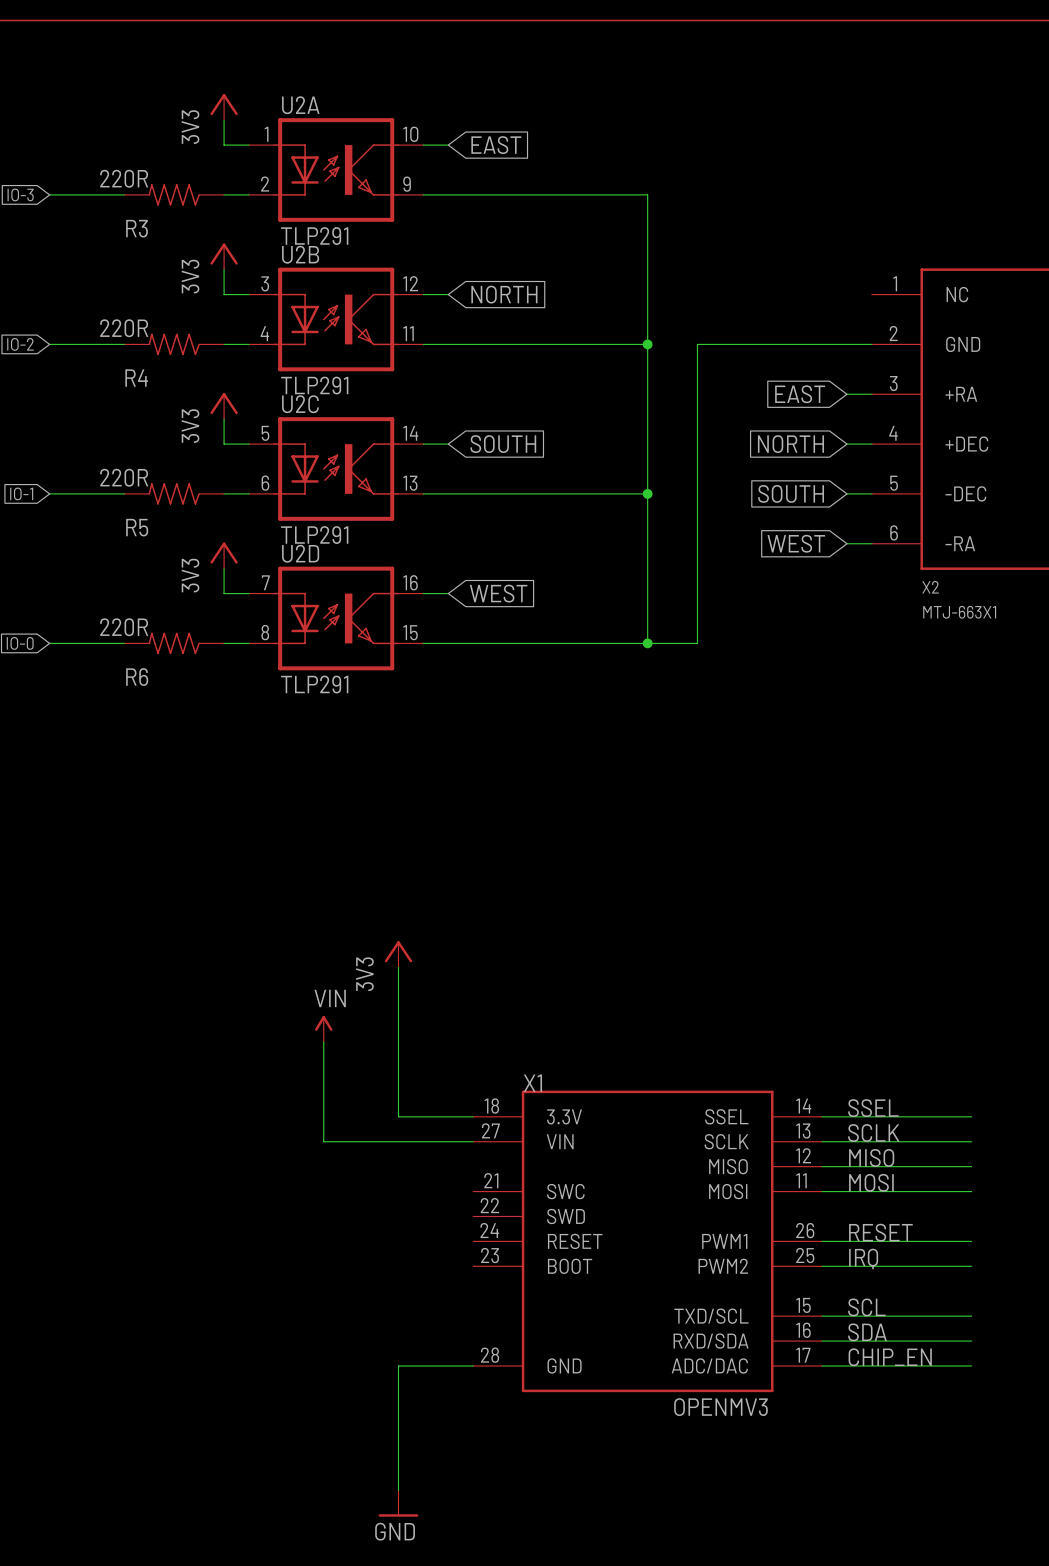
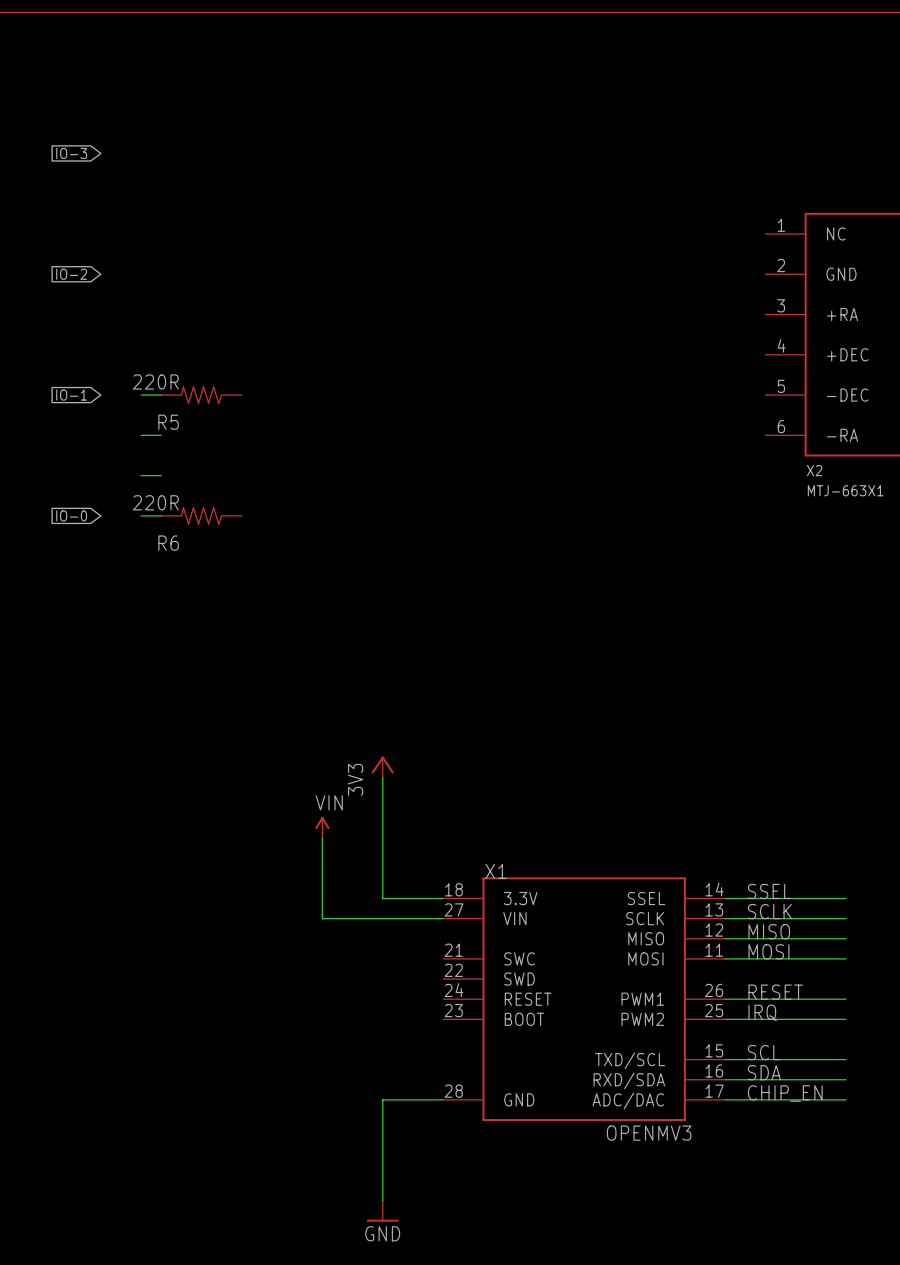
power symbol: 3V3 (224, 107) -> none
wire: (224, 120) (224, 145) (248, 145) -> none
wire: (423, 145) (448, 145) -> none
global label: EAST (496, 145) -> none
U2A: TLP291 (336, 170) -> none
wire: (49, 194) (124, 194) -> none
R3: 220R (174, 194) -> none
wire: (224, 194) (248, 194) -> none
wire: (423, 194) (647, 194) (647, 643) -> none
power symbol: 3V3 (224, 256) -> none
wire: (224, 269) (224, 294) (248, 294) -> none
wire: (423, 294) (448, 294) -> none
global label: NORTH (504, 294) -> none
U2B: TLP291 (336, 319) -> none
wire: (49, 344) (124, 344) -> none
R4: 220R (174, 344) -> none
wire: (224, 344) (248, 344) -> none
wire: (423, 344) (647, 344) -> none
junction: (647, 344) -> none
wire: (871, 344) (697, 344) (697, 643) (423, 643) -> none
global label: EAST (800, 394) -> none
wire: (846, 394) (871, 394) -> none
power symbol: 3V3 (224, 406) -> none
wire: (224, 419) (224, 444) (248, 444) -> none
wire: (423, 444) (448, 444) -> none
global label: SOUTH (503, 444) -> none
global label: NORTH (790, 444) -> none
wire: (846, 444) (871, 444) -> none
U2C: TLP291 (336, 468) -> none
wire: (49, 493) (99, 493) -> none
wire: (224, 493) (248, 493) -> (141, 435) (161, 435)
wire: (423, 493) (647, 493) -> none
junction: (647, 493) -> none
global label: SOUTH (791, 493) -> none
wire: (846, 493) (871, 493) -> none
global label: WEST (796, 543) -> none
wire: (846, 543) (871, 543) -> none
power symbol: 3V3 (224, 555) -> none
wire: (224, 568) (224, 593) (248, 593) -> none
wire: (423, 593) (448, 593) -> none
global label: WEST (498, 593) -> none
U2D: TLP291 (336, 618) -> none
wire: (49, 643) (99, 643) -> none
wire: (224, 643) (248, 643) -> (141, 475) (161, 475)
junction: (647, 643) -> none

